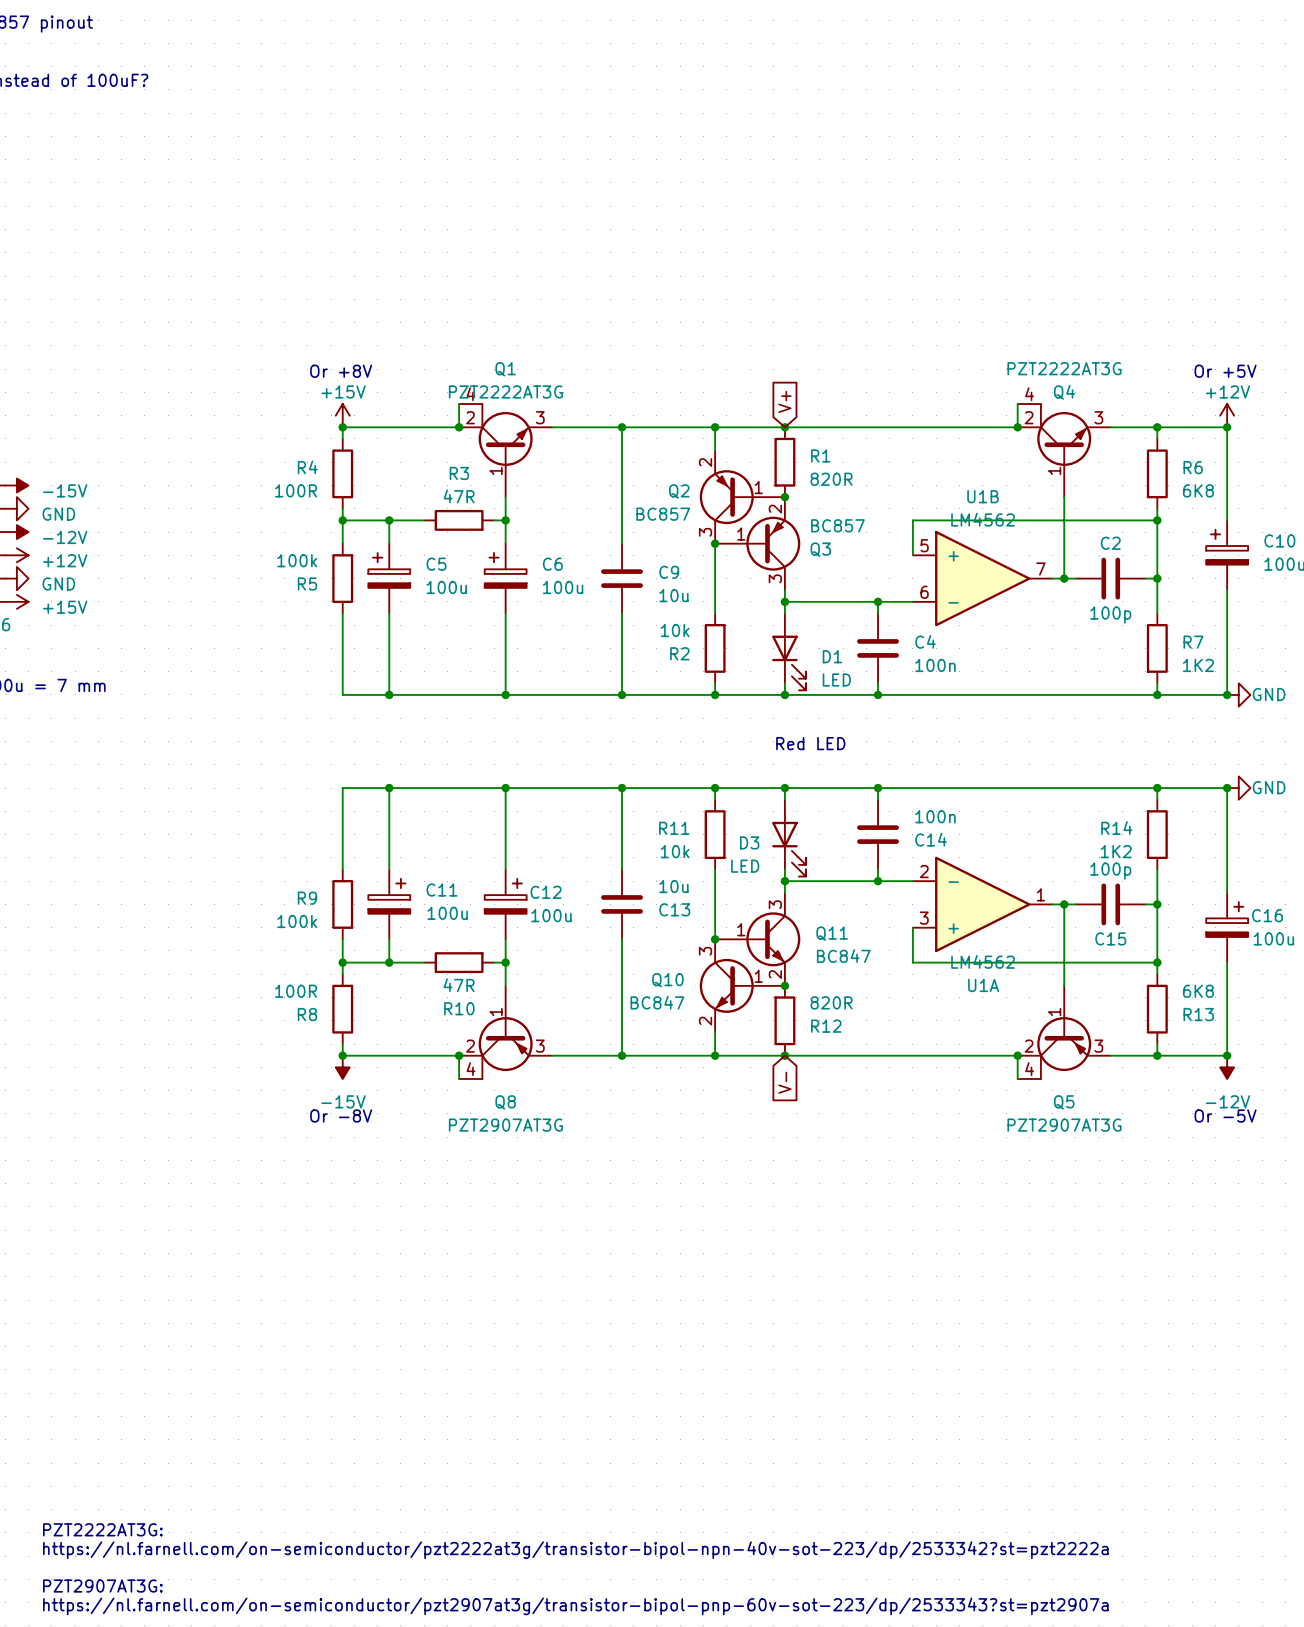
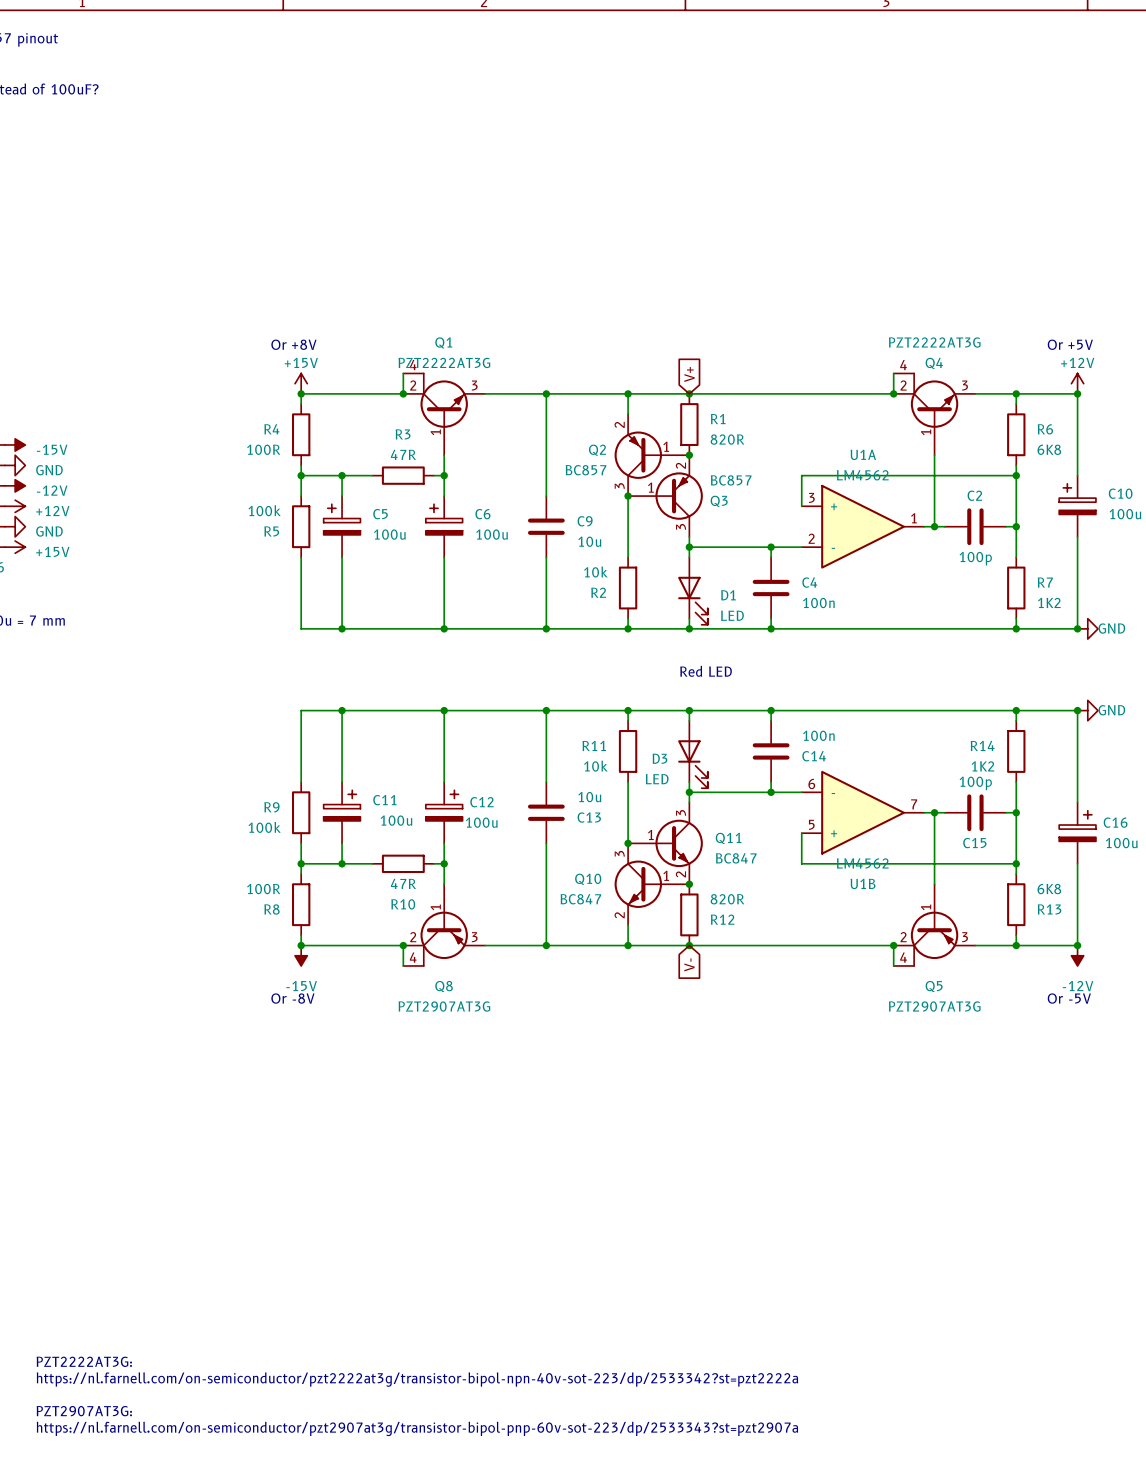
U1B flip: as is (982, 578) -> up-down (863, 812)
U1B position: (982, 578) -> (863, 812)
U1A flip: as is (982, 904) -> up-down (863, 526)
U1A position: (982, 904) -> (863, 526)

